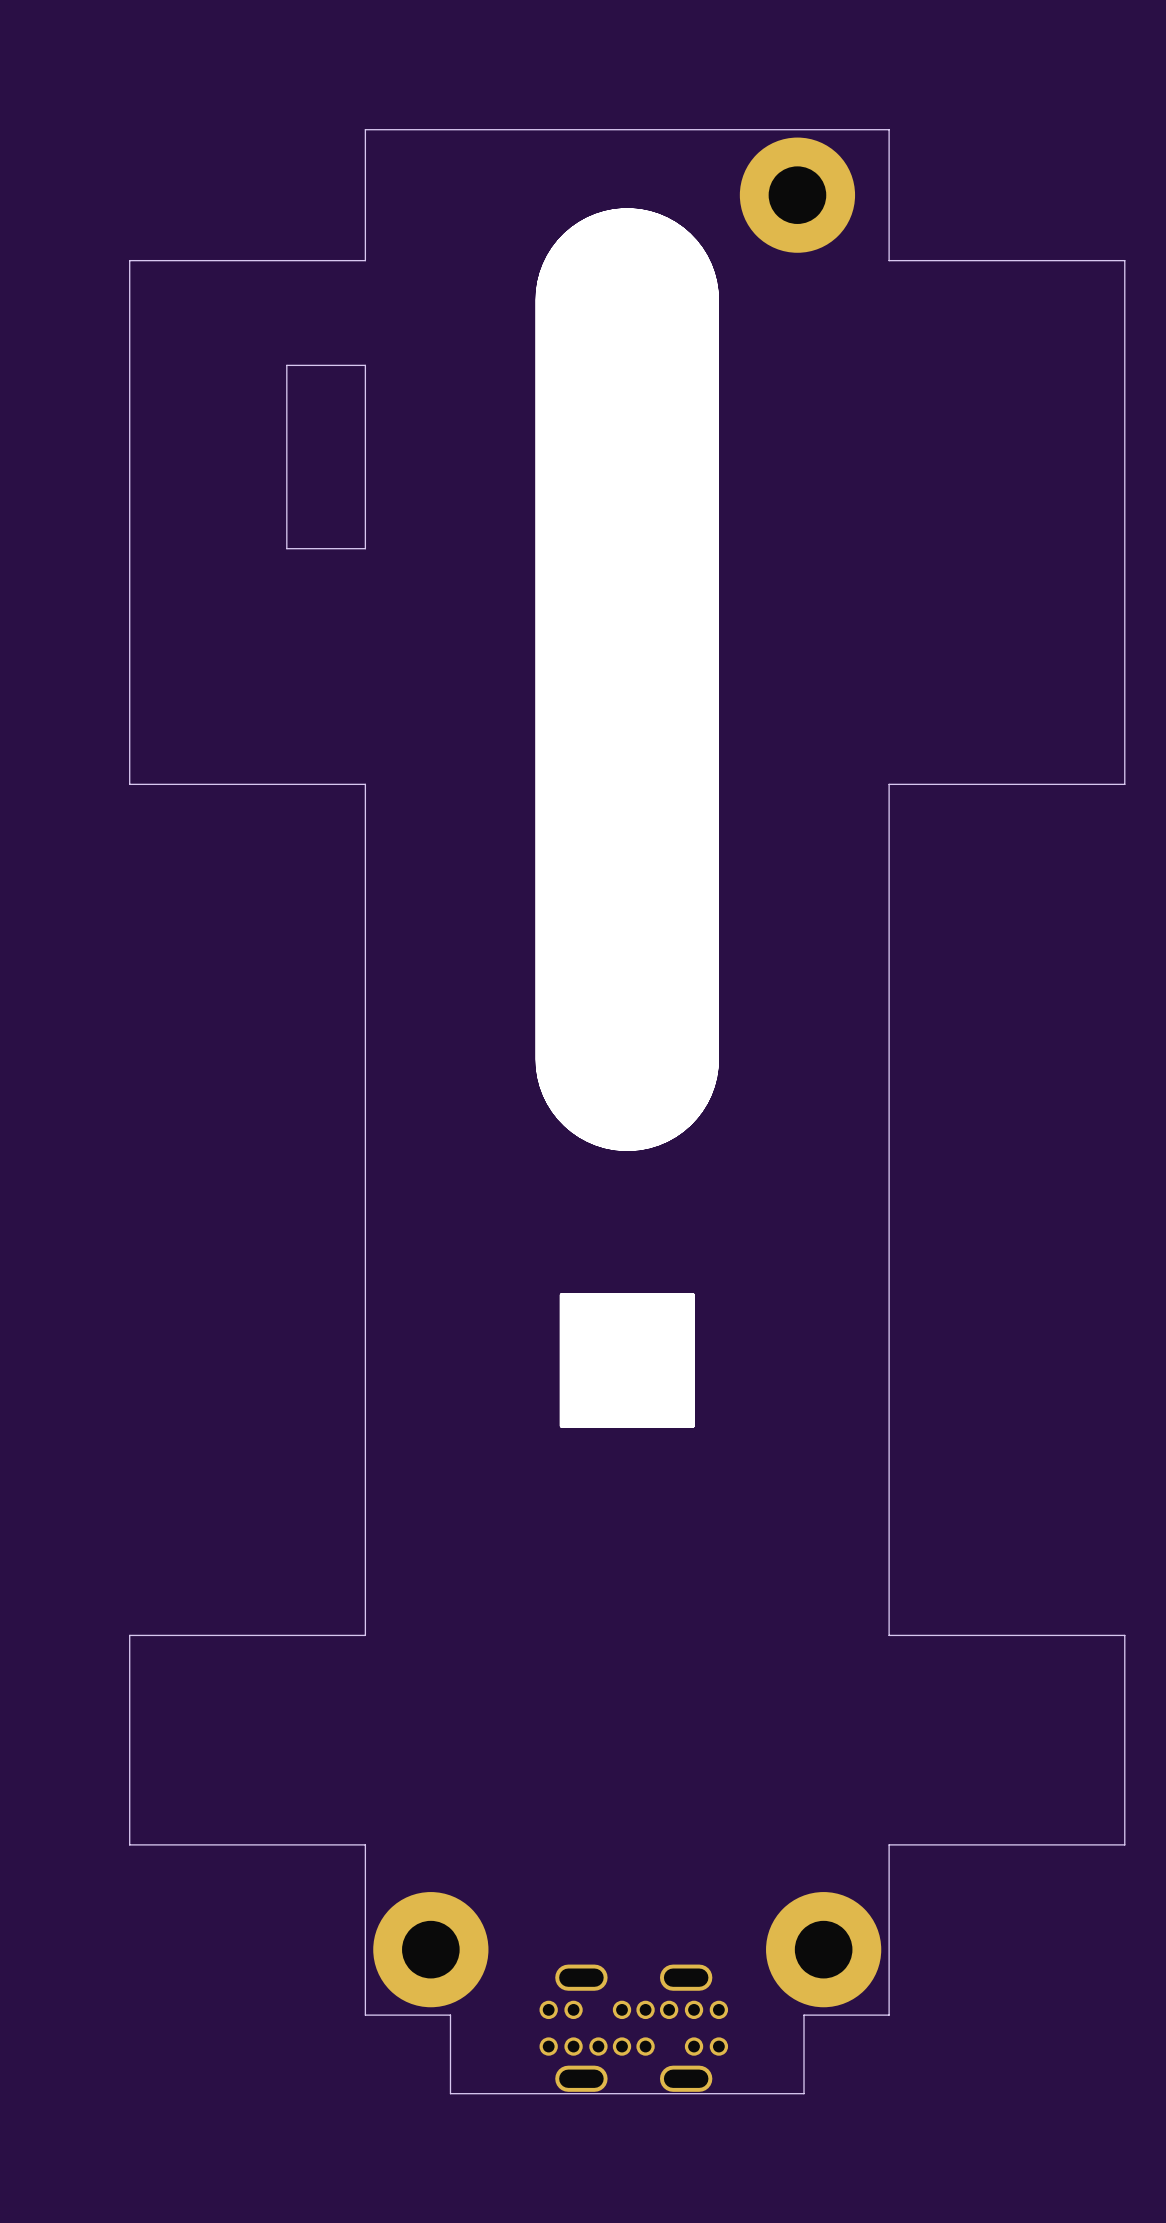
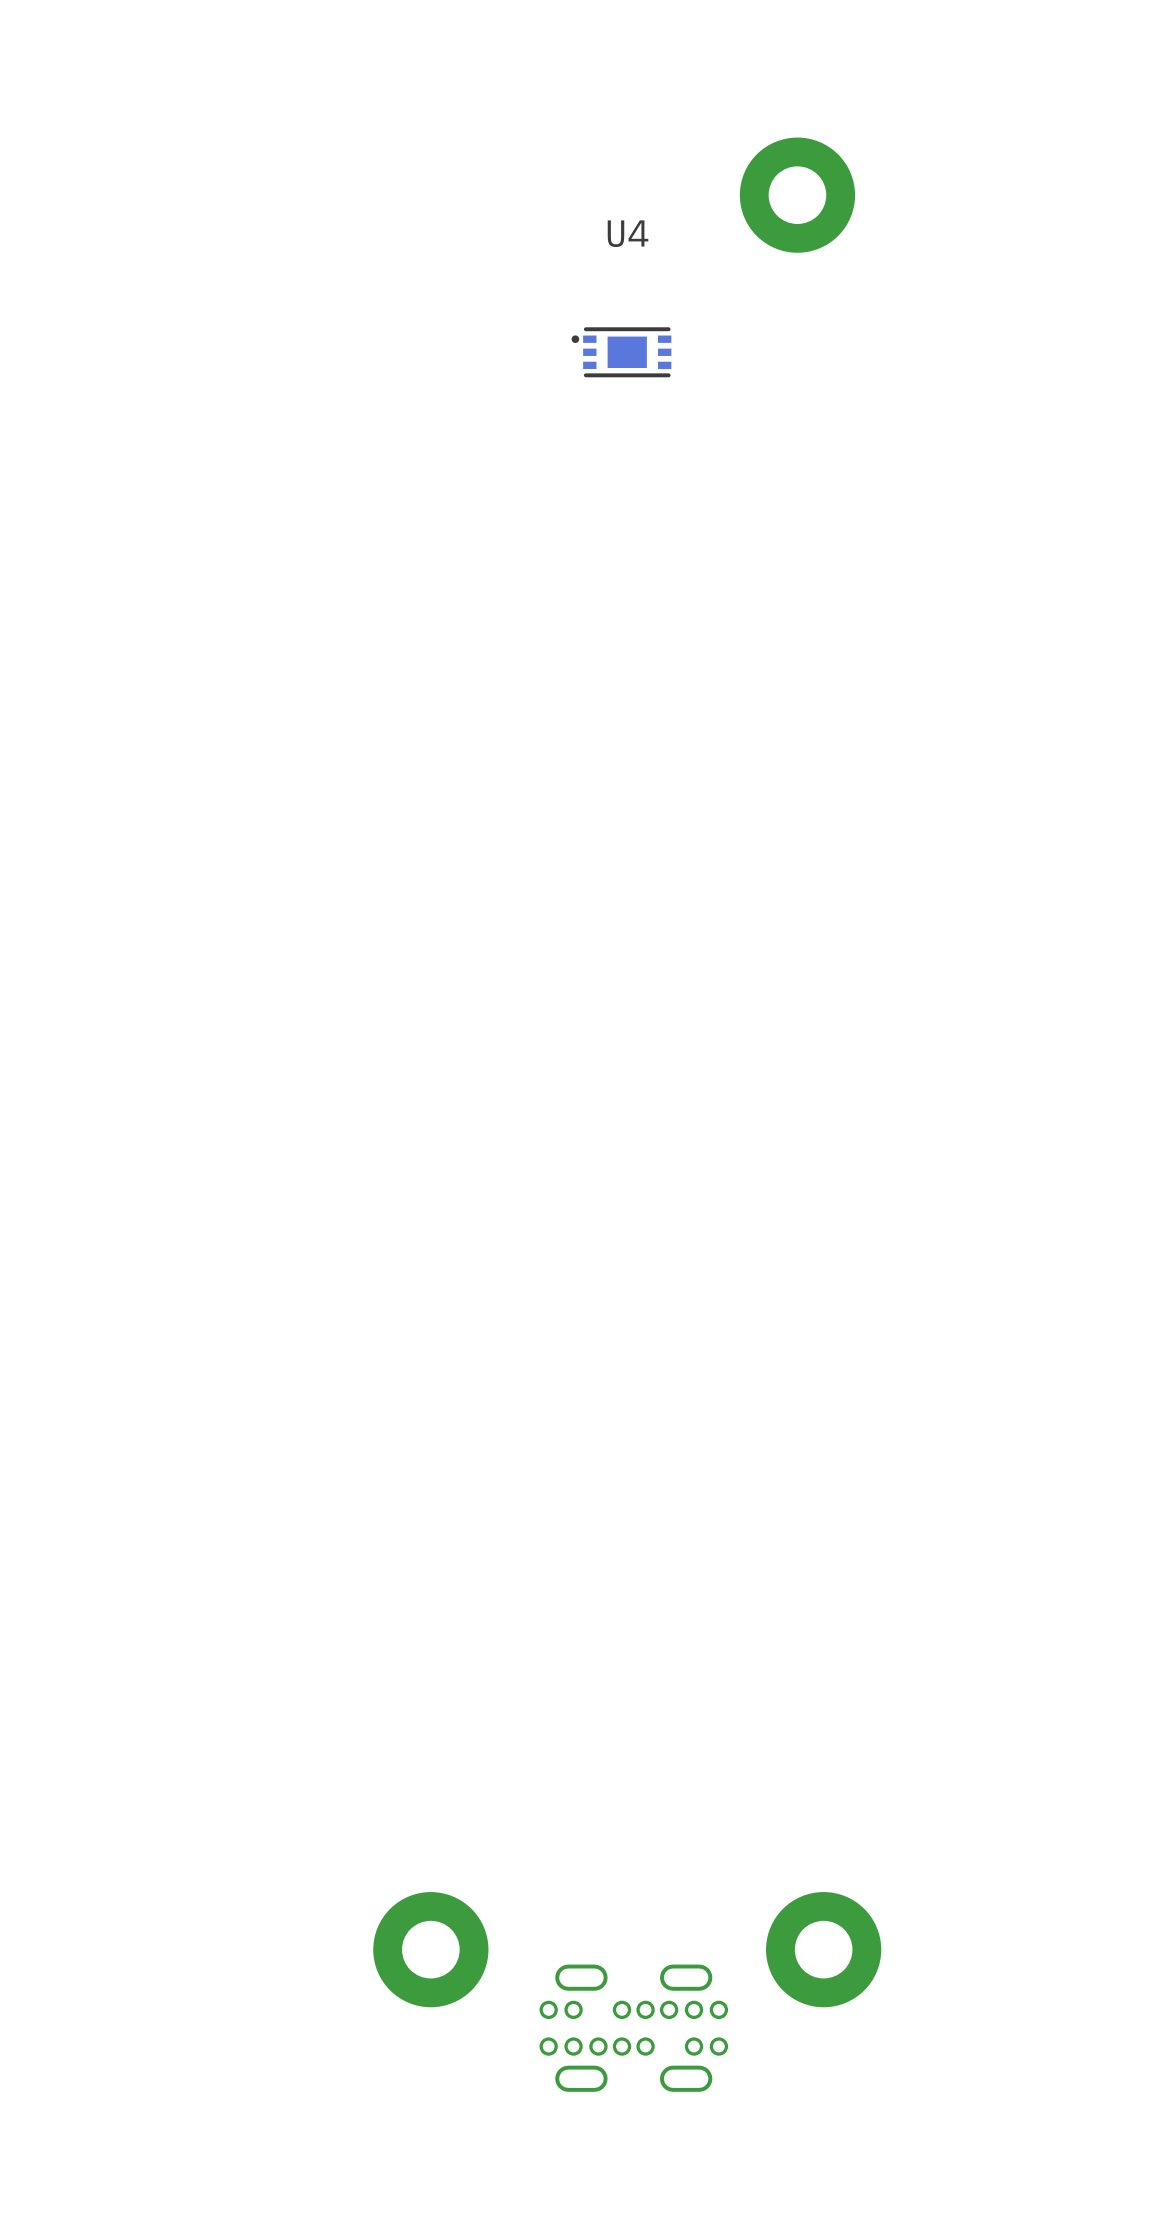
board edge: (889, 129) (889, 260) (1124, 260) (1124, 784) (889, 784) (889, 1635) (1124, 1635) (1124, 1844) (889, 1844) (889, 2015) (804, 2015) (804, 2093) (450, 2093) (450, 2015) (365, 2015) (365, 1844) (129, 1844) (129, 1635) (365, 1635) (365, 784) (129, 784) (129, 260) (365, 260) (365, 129) (889, 129) -> none
line: (627, 299) (627, 1059) -> none
board edge: (365, 365) (365, 548) (286, 548) (286, 365) (365, 365) -> none
drawing: [559, 1293, 695, 1428] -> none

